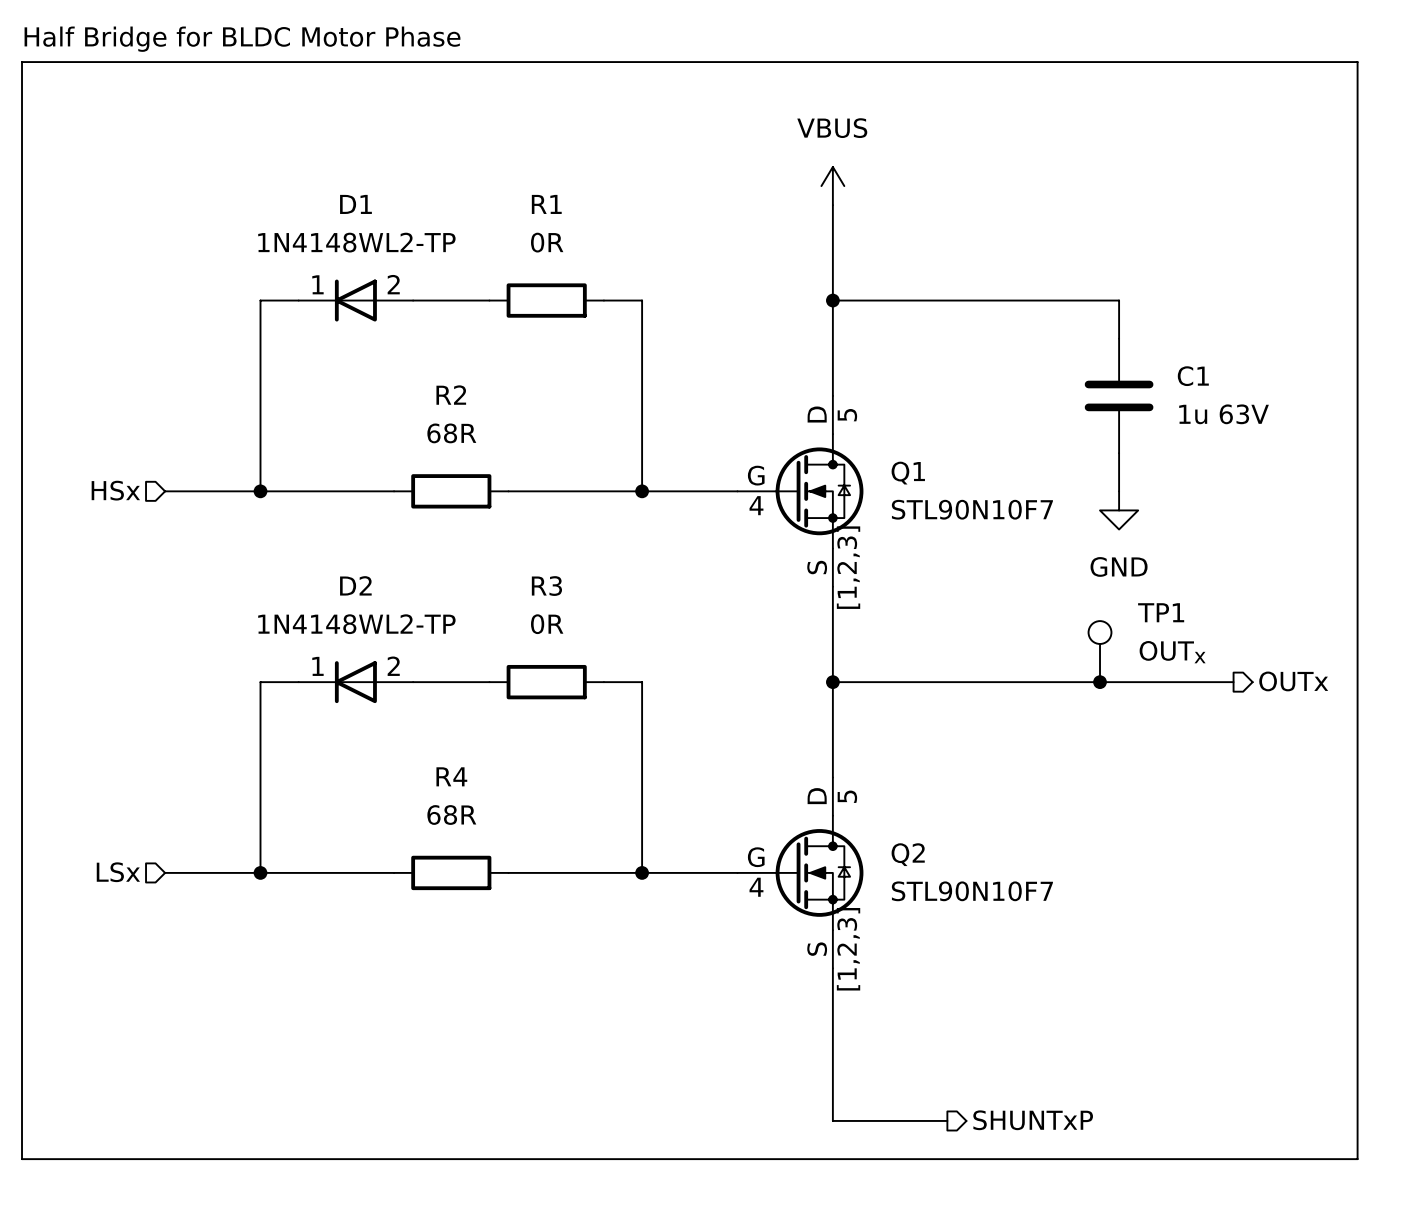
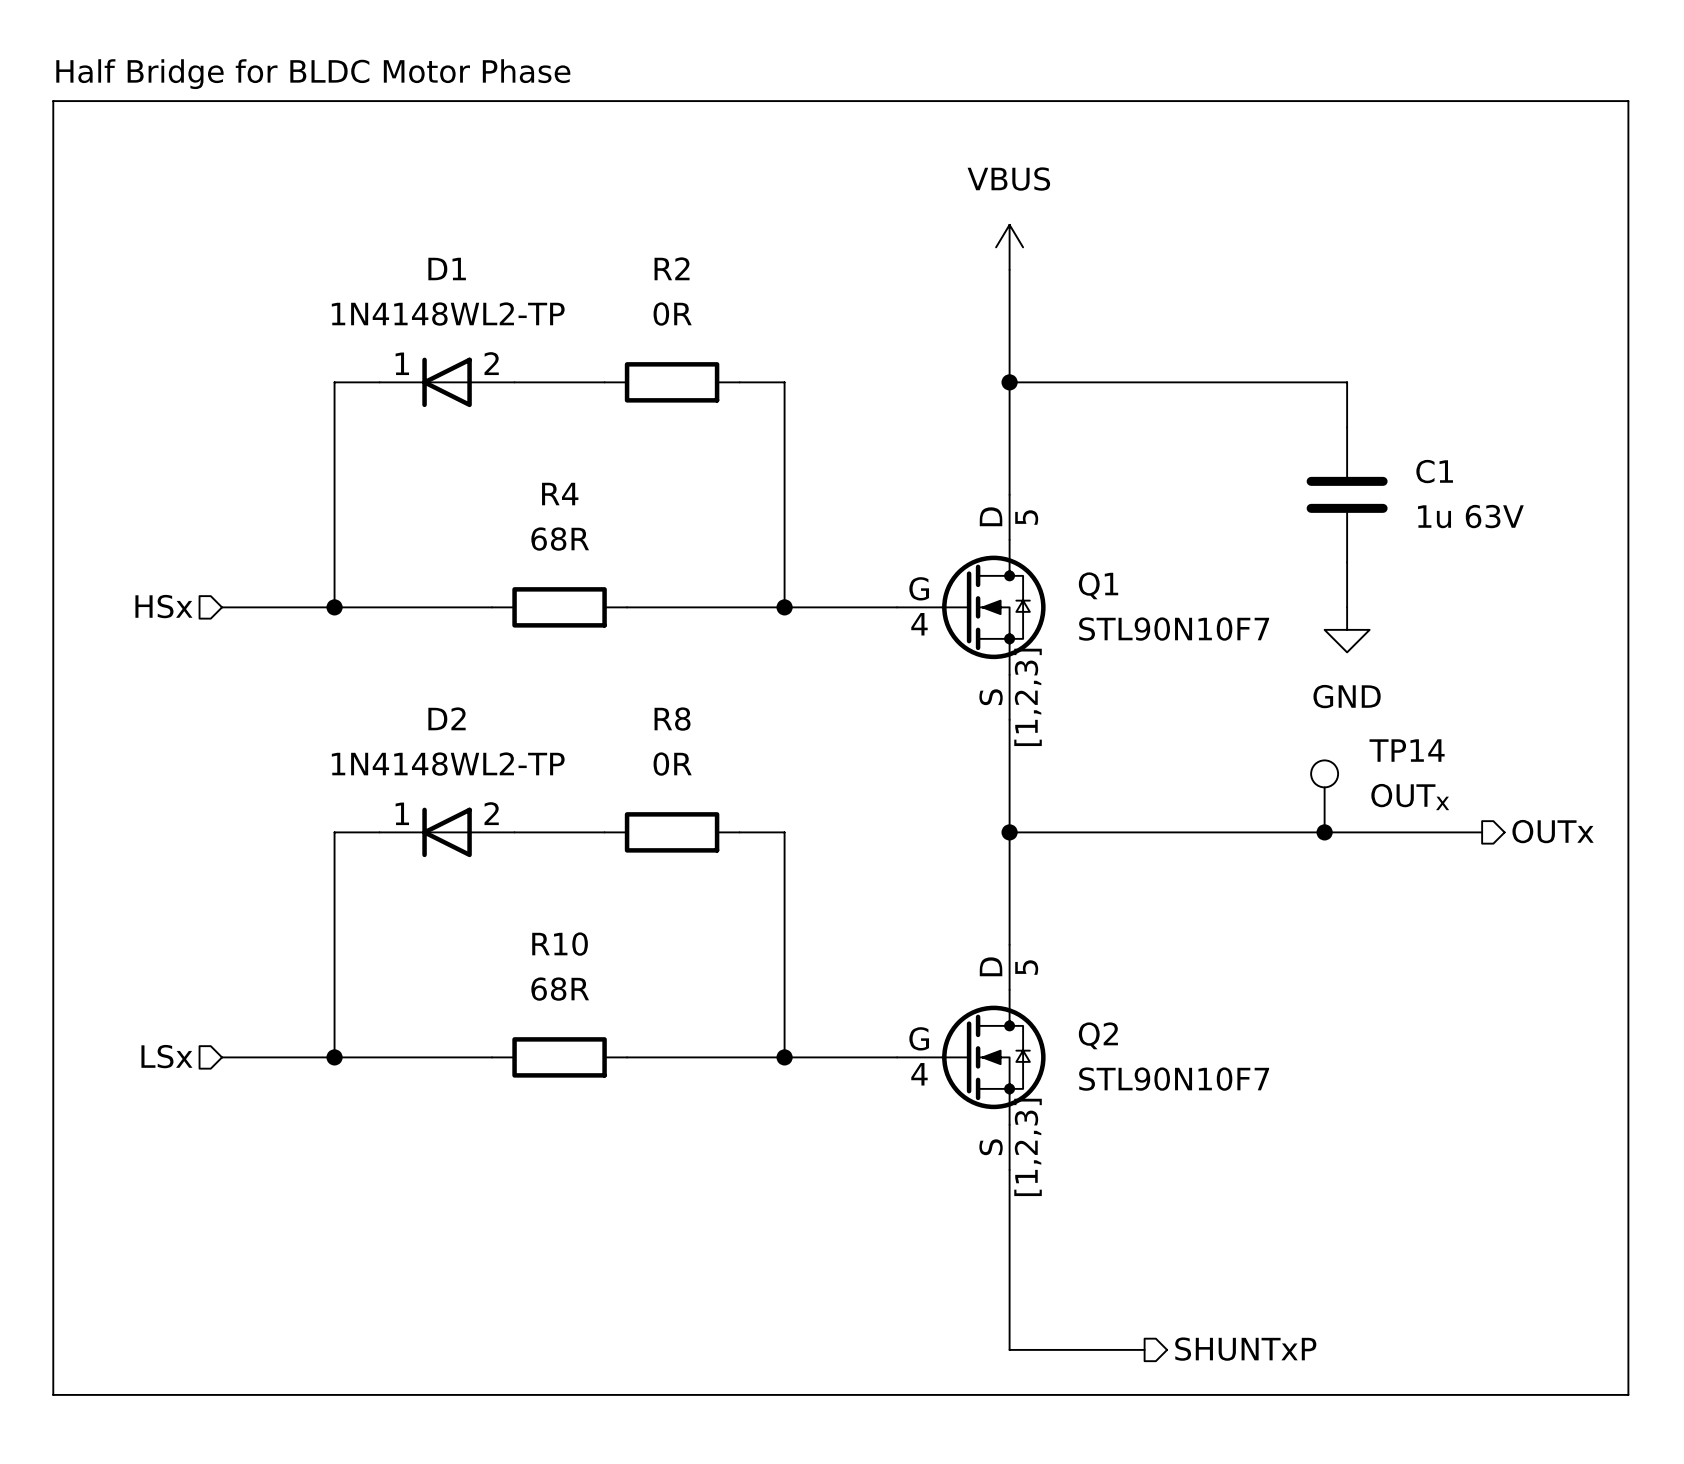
R1 name: R1 (546, 204) -> R2 (672, 268)
R2 name: R2 (451, 395) -> R4 (560, 494)
R3 name: R3 (546, 586) -> R8 (672, 719)
TP1 name: TP1 (1161, 612) -> TP14 (1407, 750)
R4 name: R4 (451, 776) -> R10 (560, 944)

